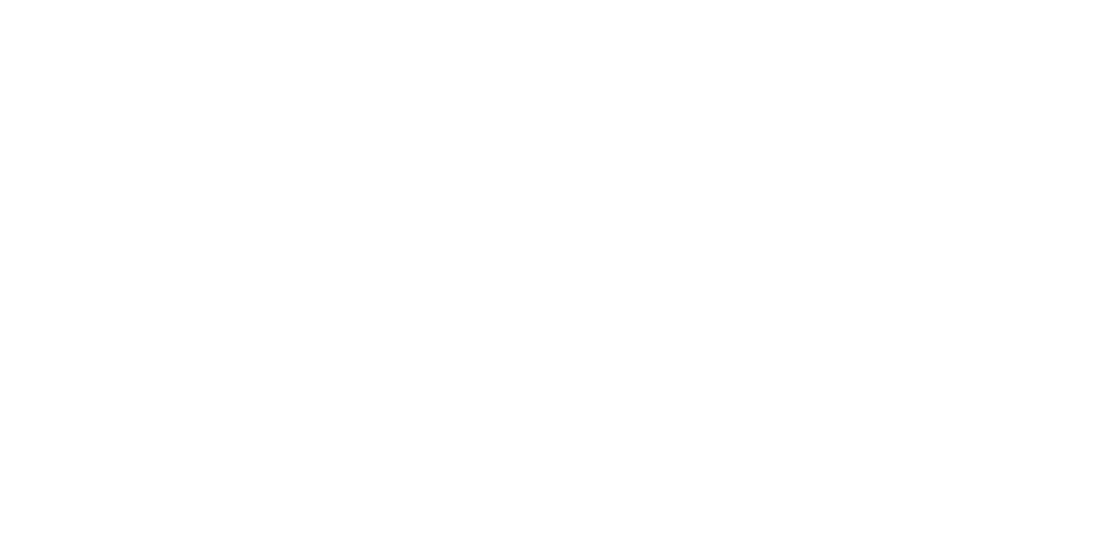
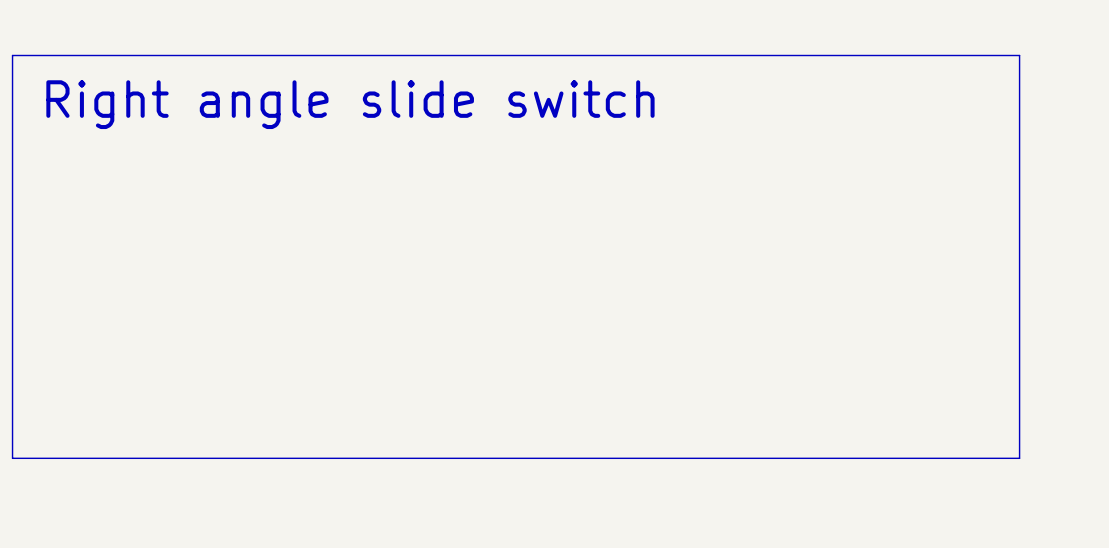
line: none -> (12, 55) (1019, 55) (1019, 458) (12, 458) (12, 55)
text: none -> Right angle slide switch (350, 104)

